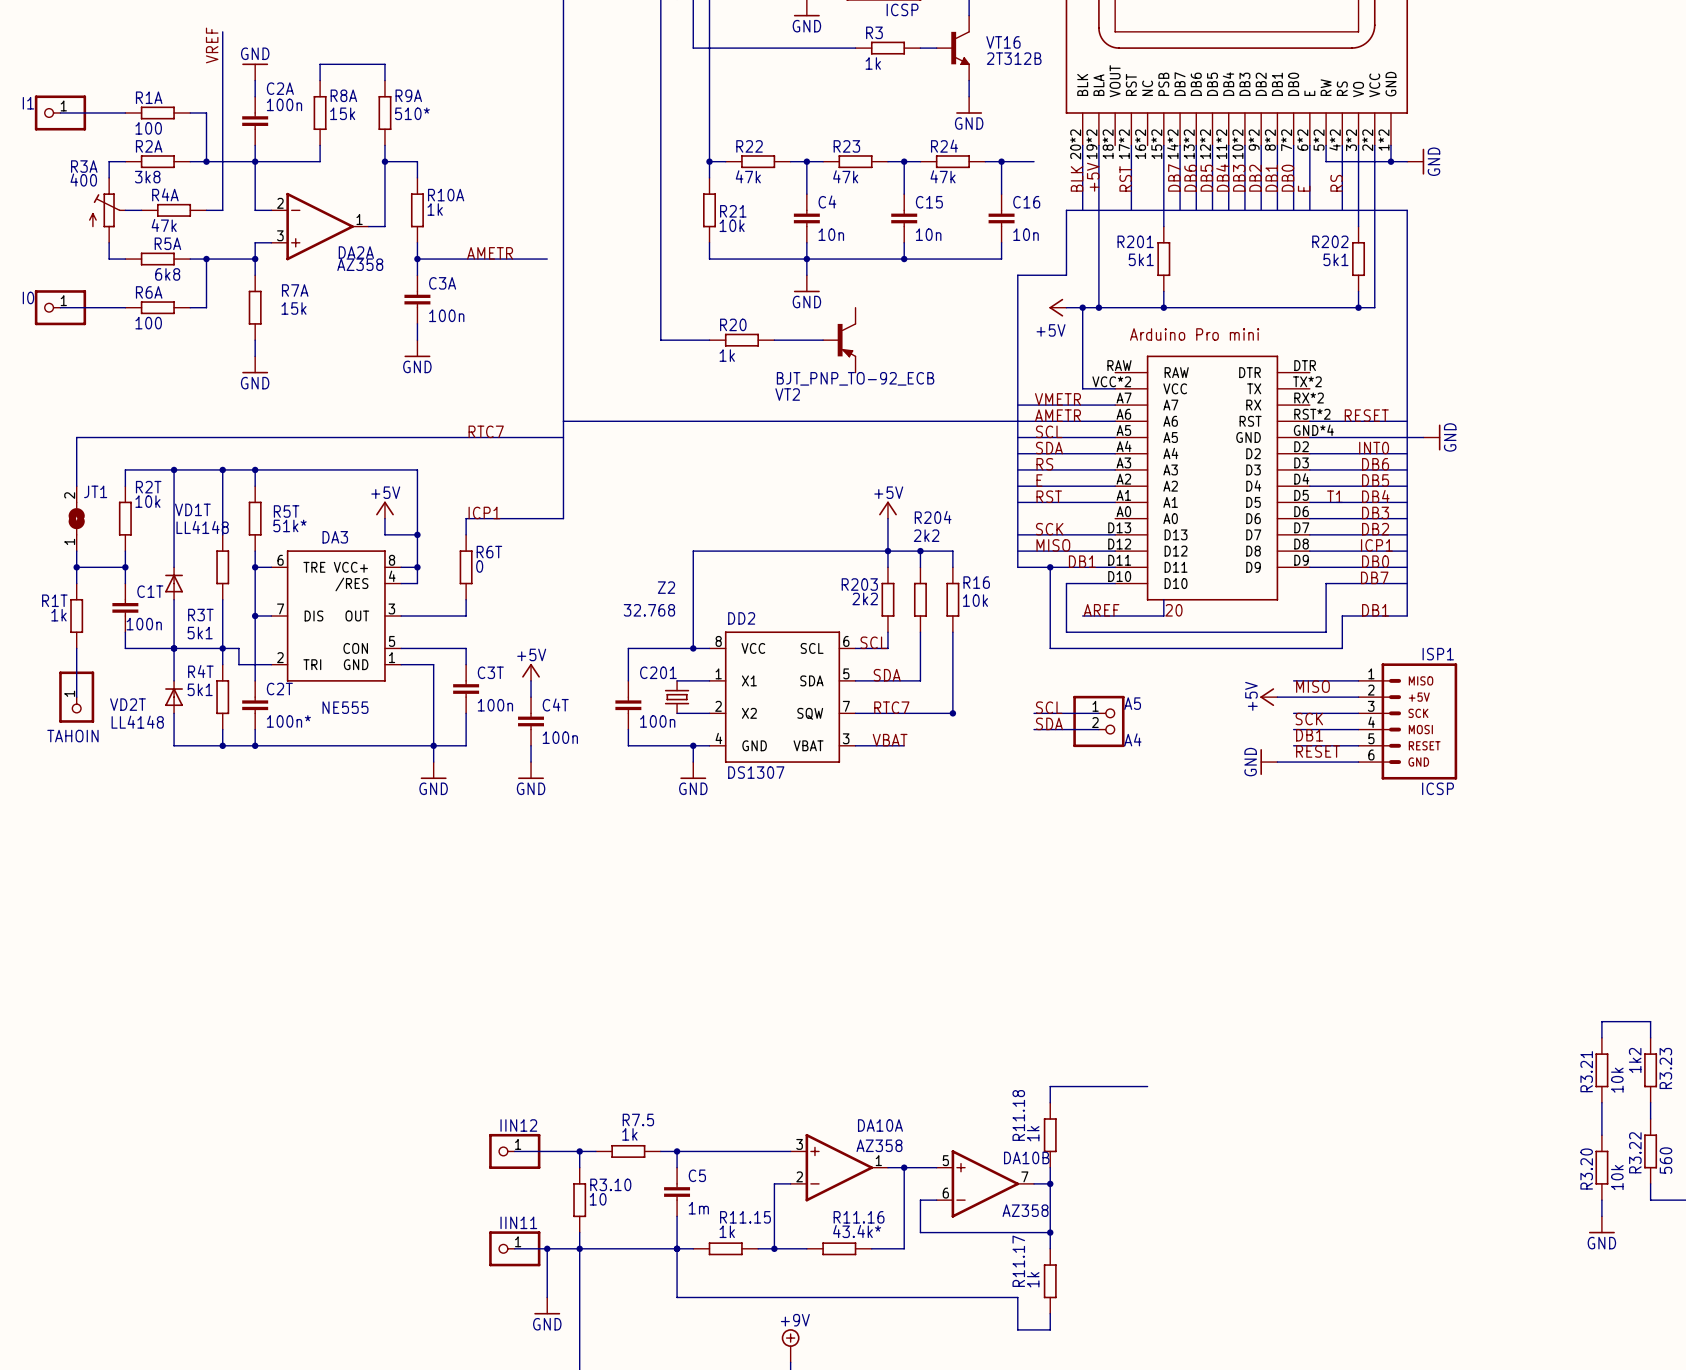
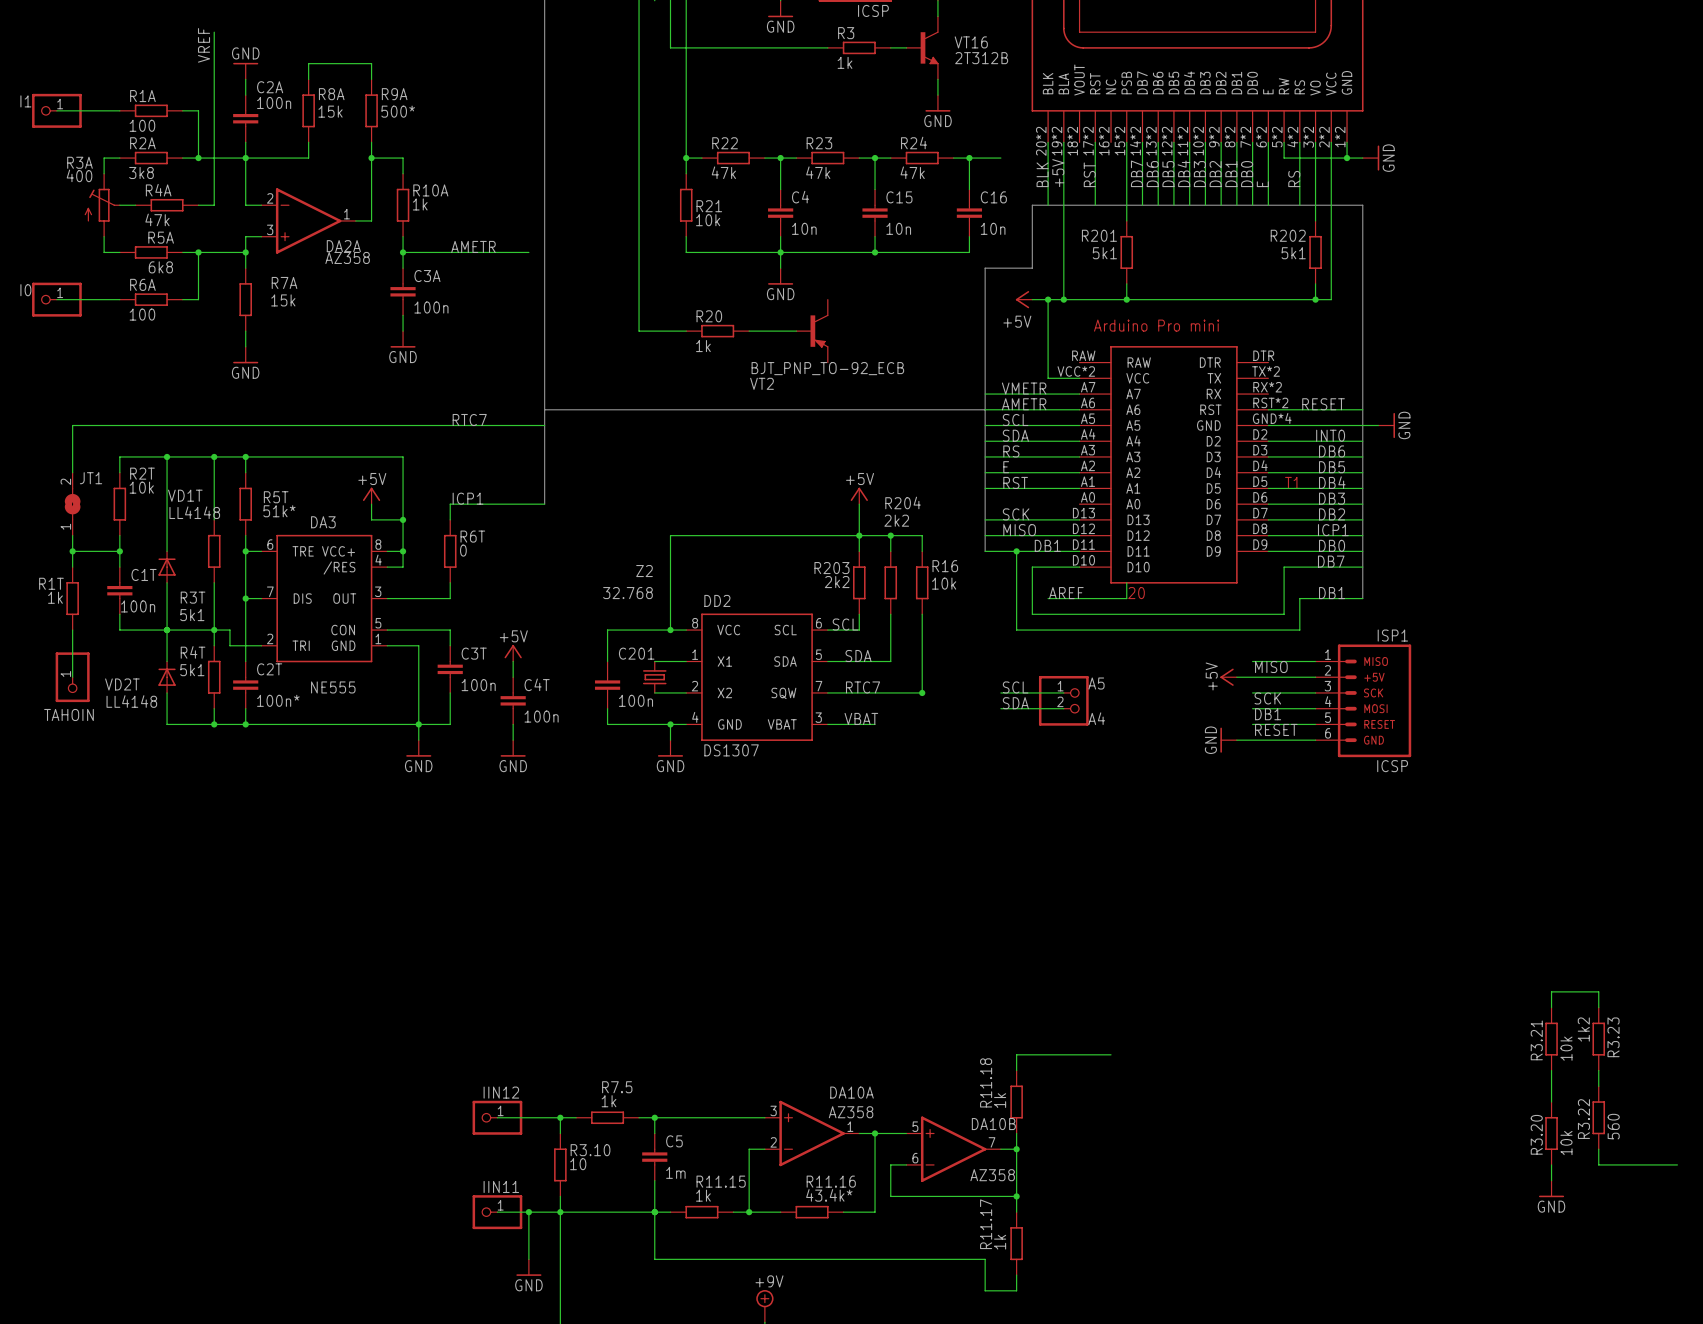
R9A value: 510* (412, 113) -> 500* (398, 111)

